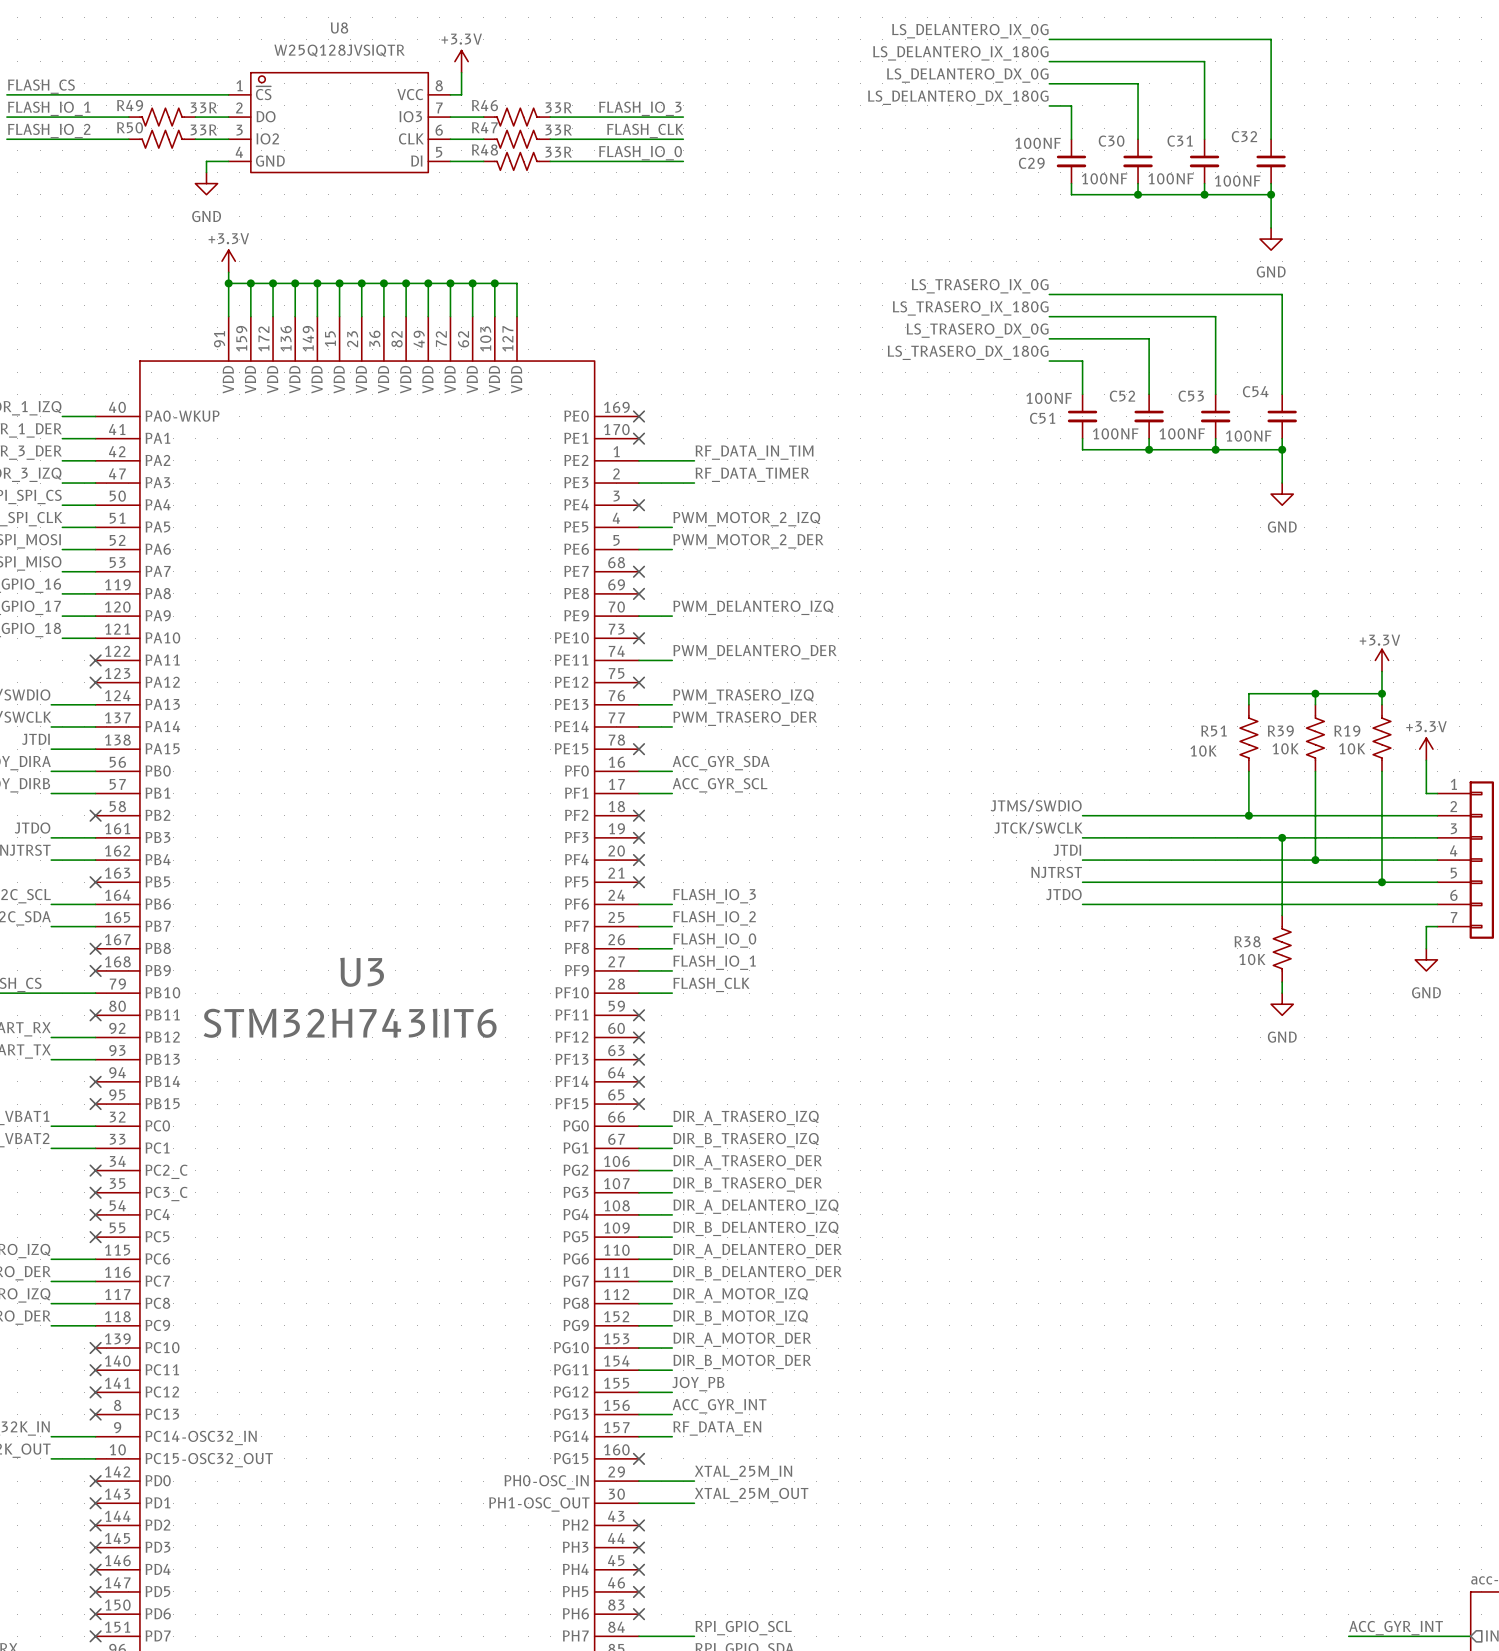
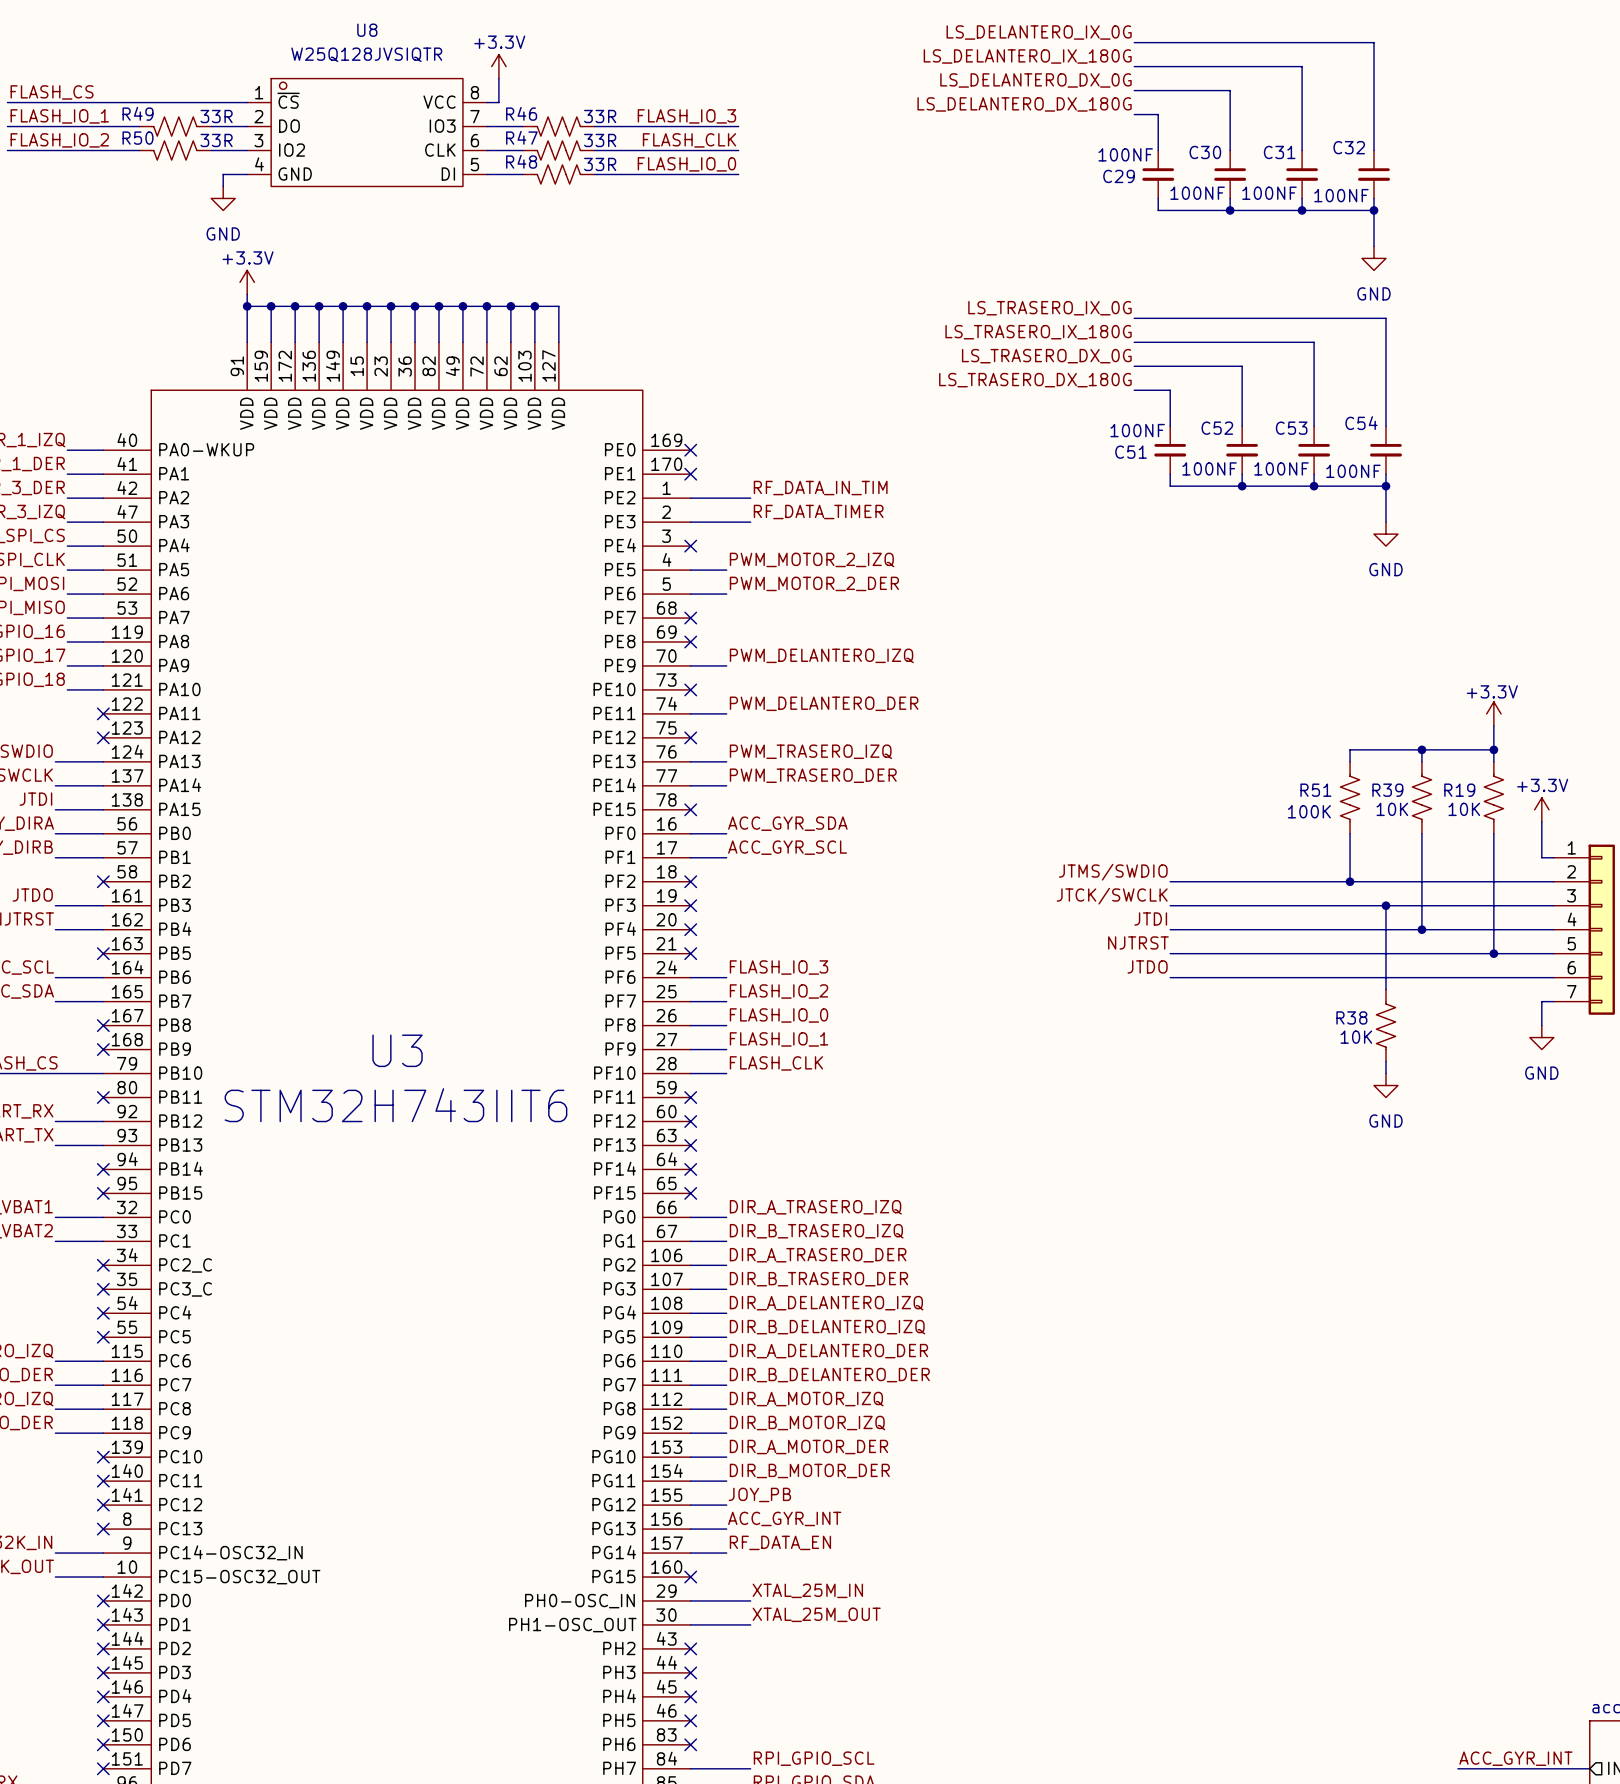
R51 value: 10K (1203, 751) -> 100K (1309, 811)

